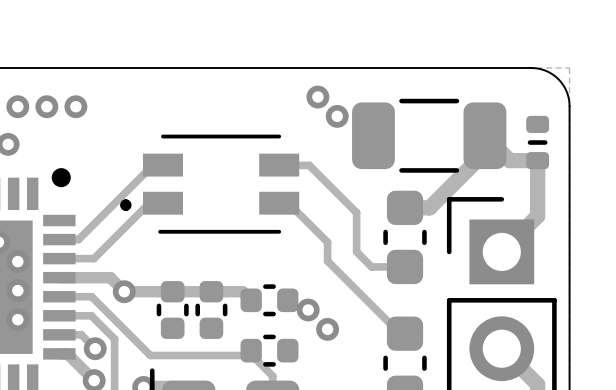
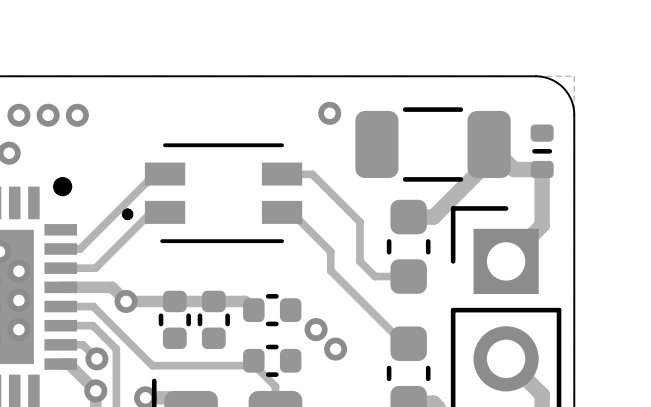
via: (317, 97) -> none
via: none -> (329, 113)
via: (337, 116) -> none
via: (308, 309) -> none
via: none -> (316, 329)
via: (327, 329) -> none
via: none -> (335, 349)

